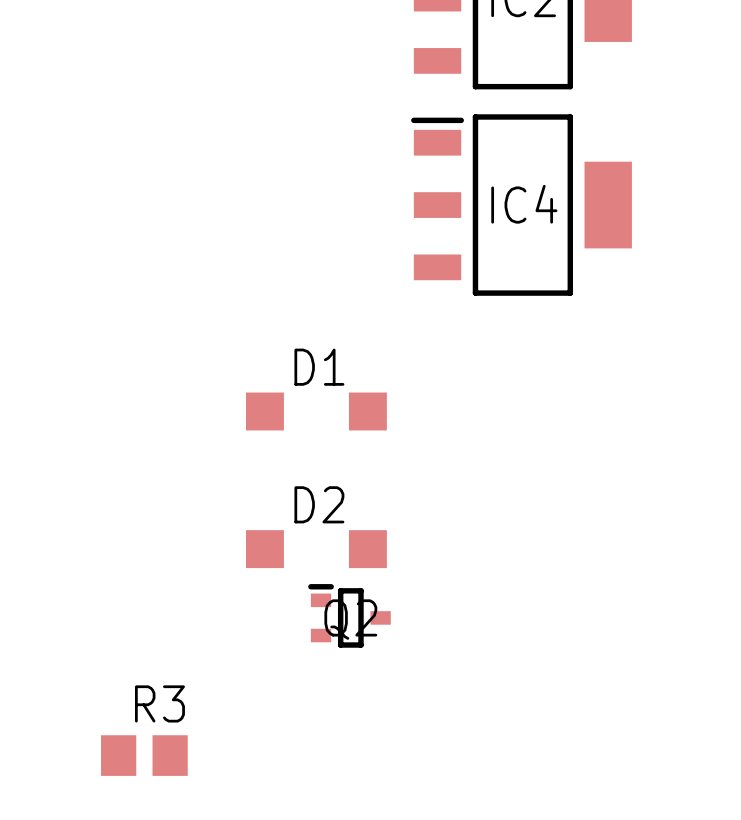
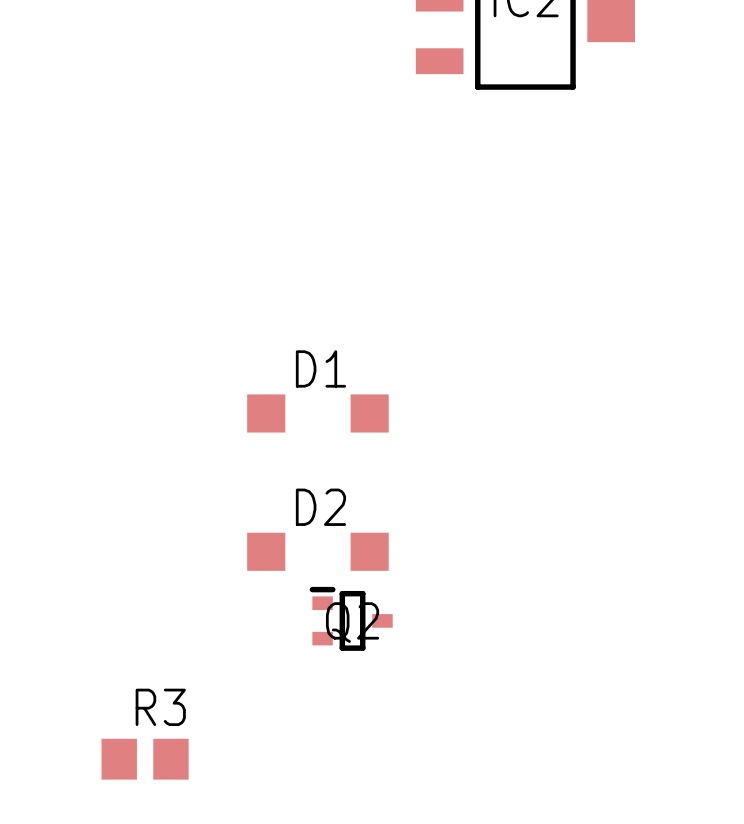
IC4: (521, 205) -> none

